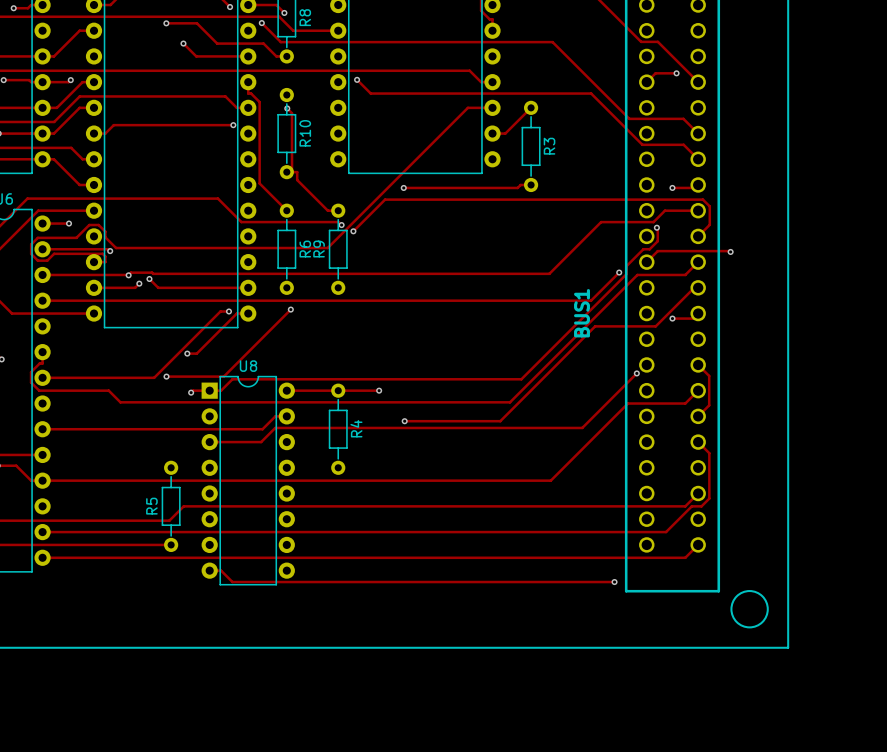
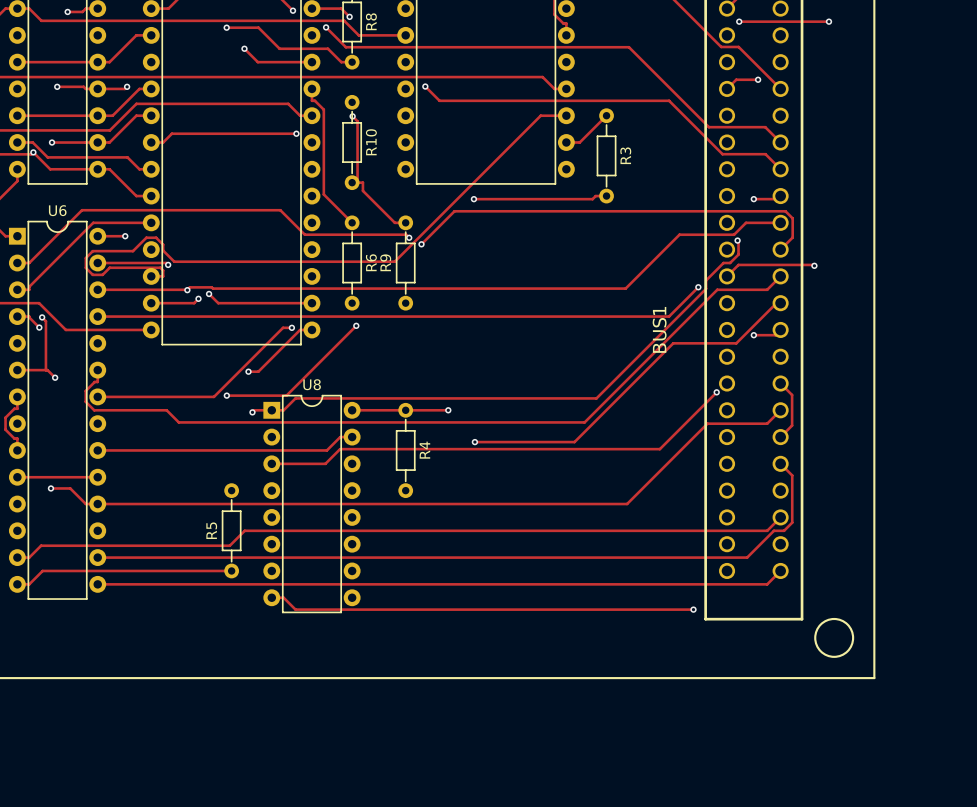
track: none -> (739, 21) (828, 21)
via: none -> (739, 21)
via: none -> (828, 21)

